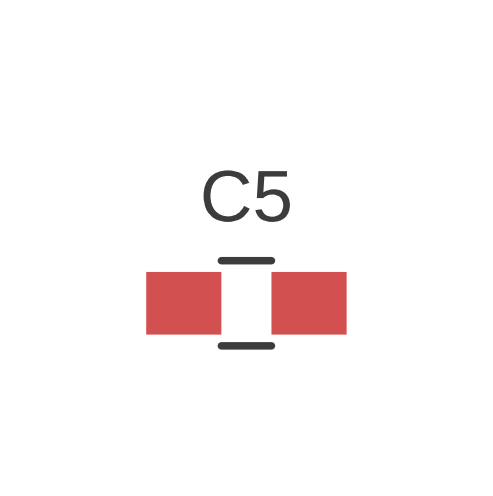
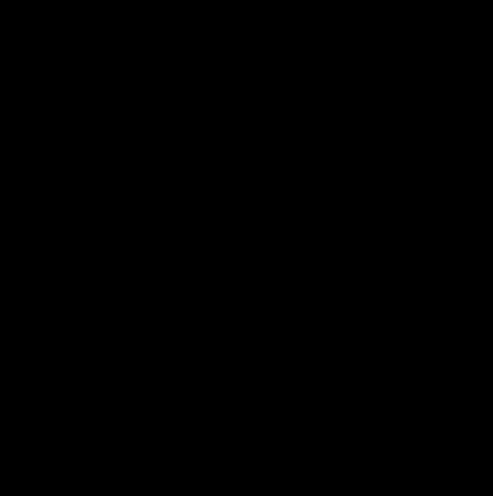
C5: (246, 303) -> none

